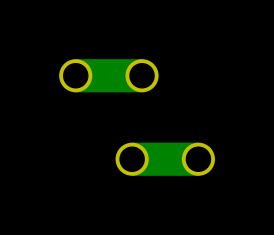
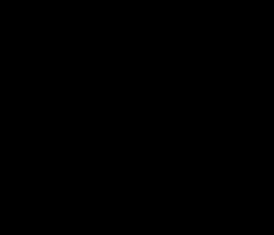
part: (108, 75) -> none
part: (165, 159) -> none

